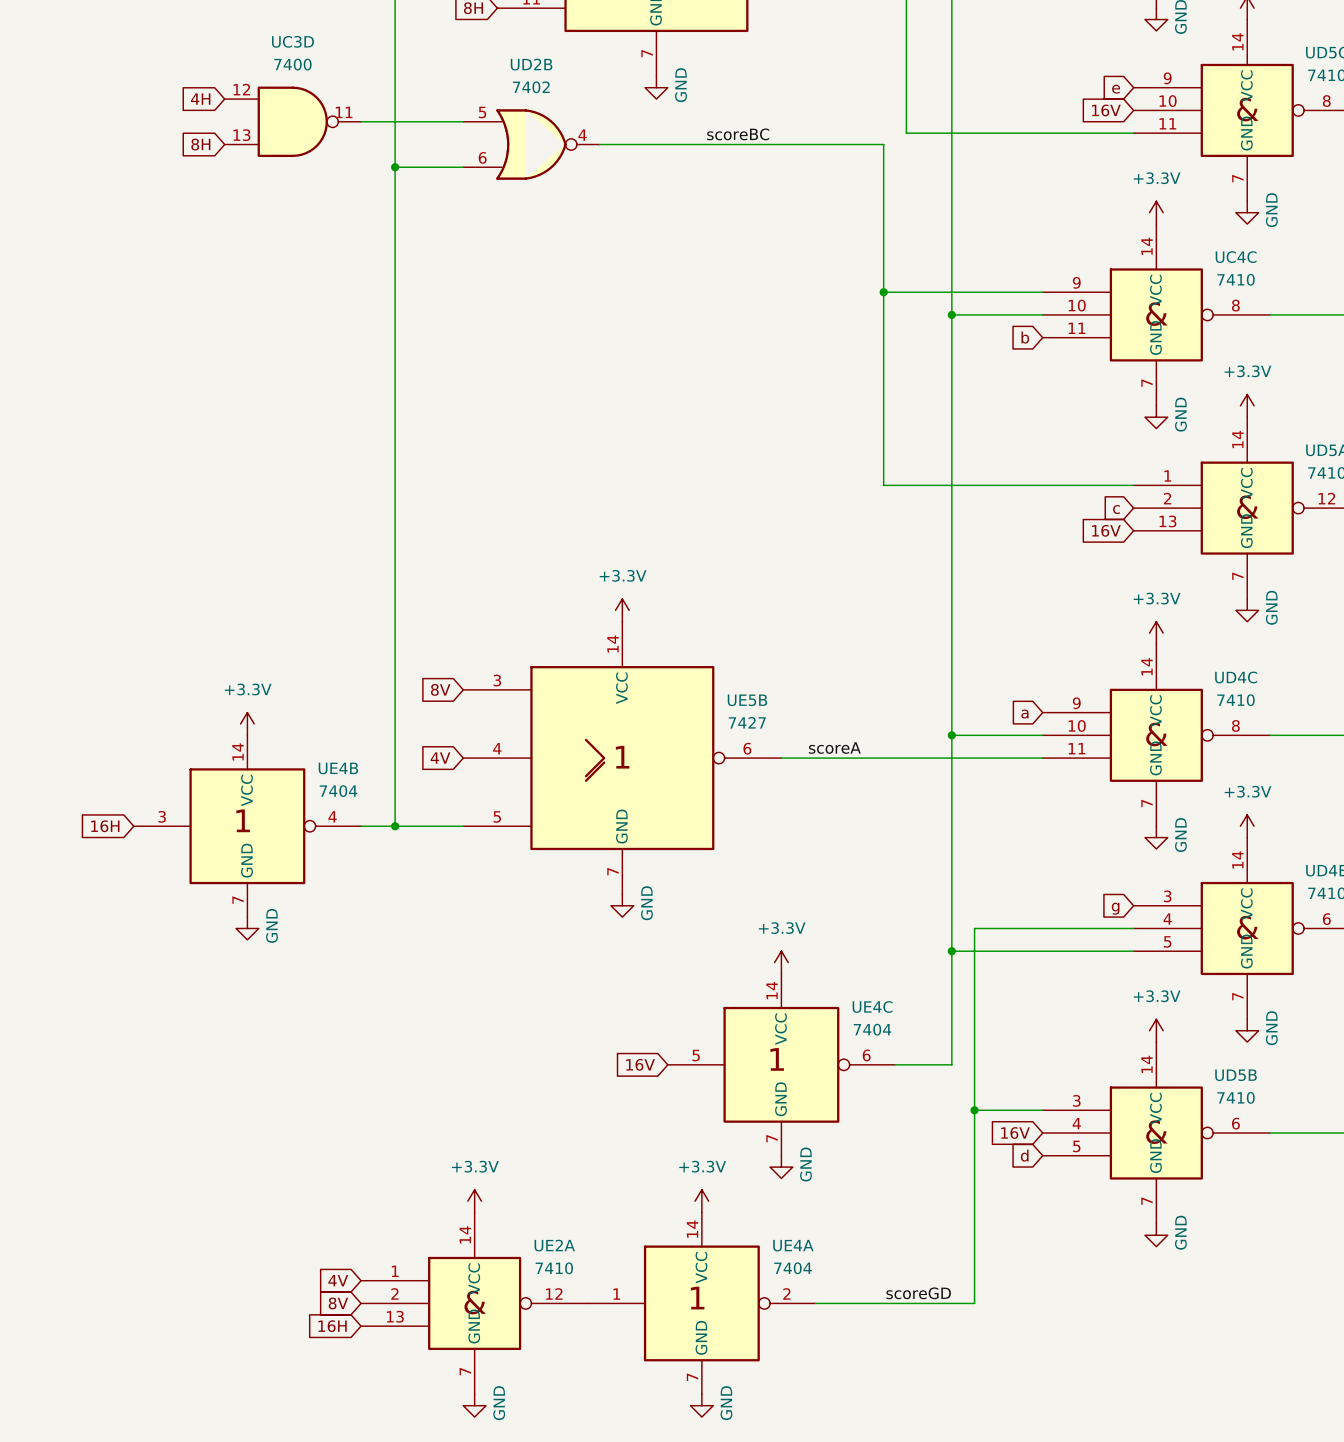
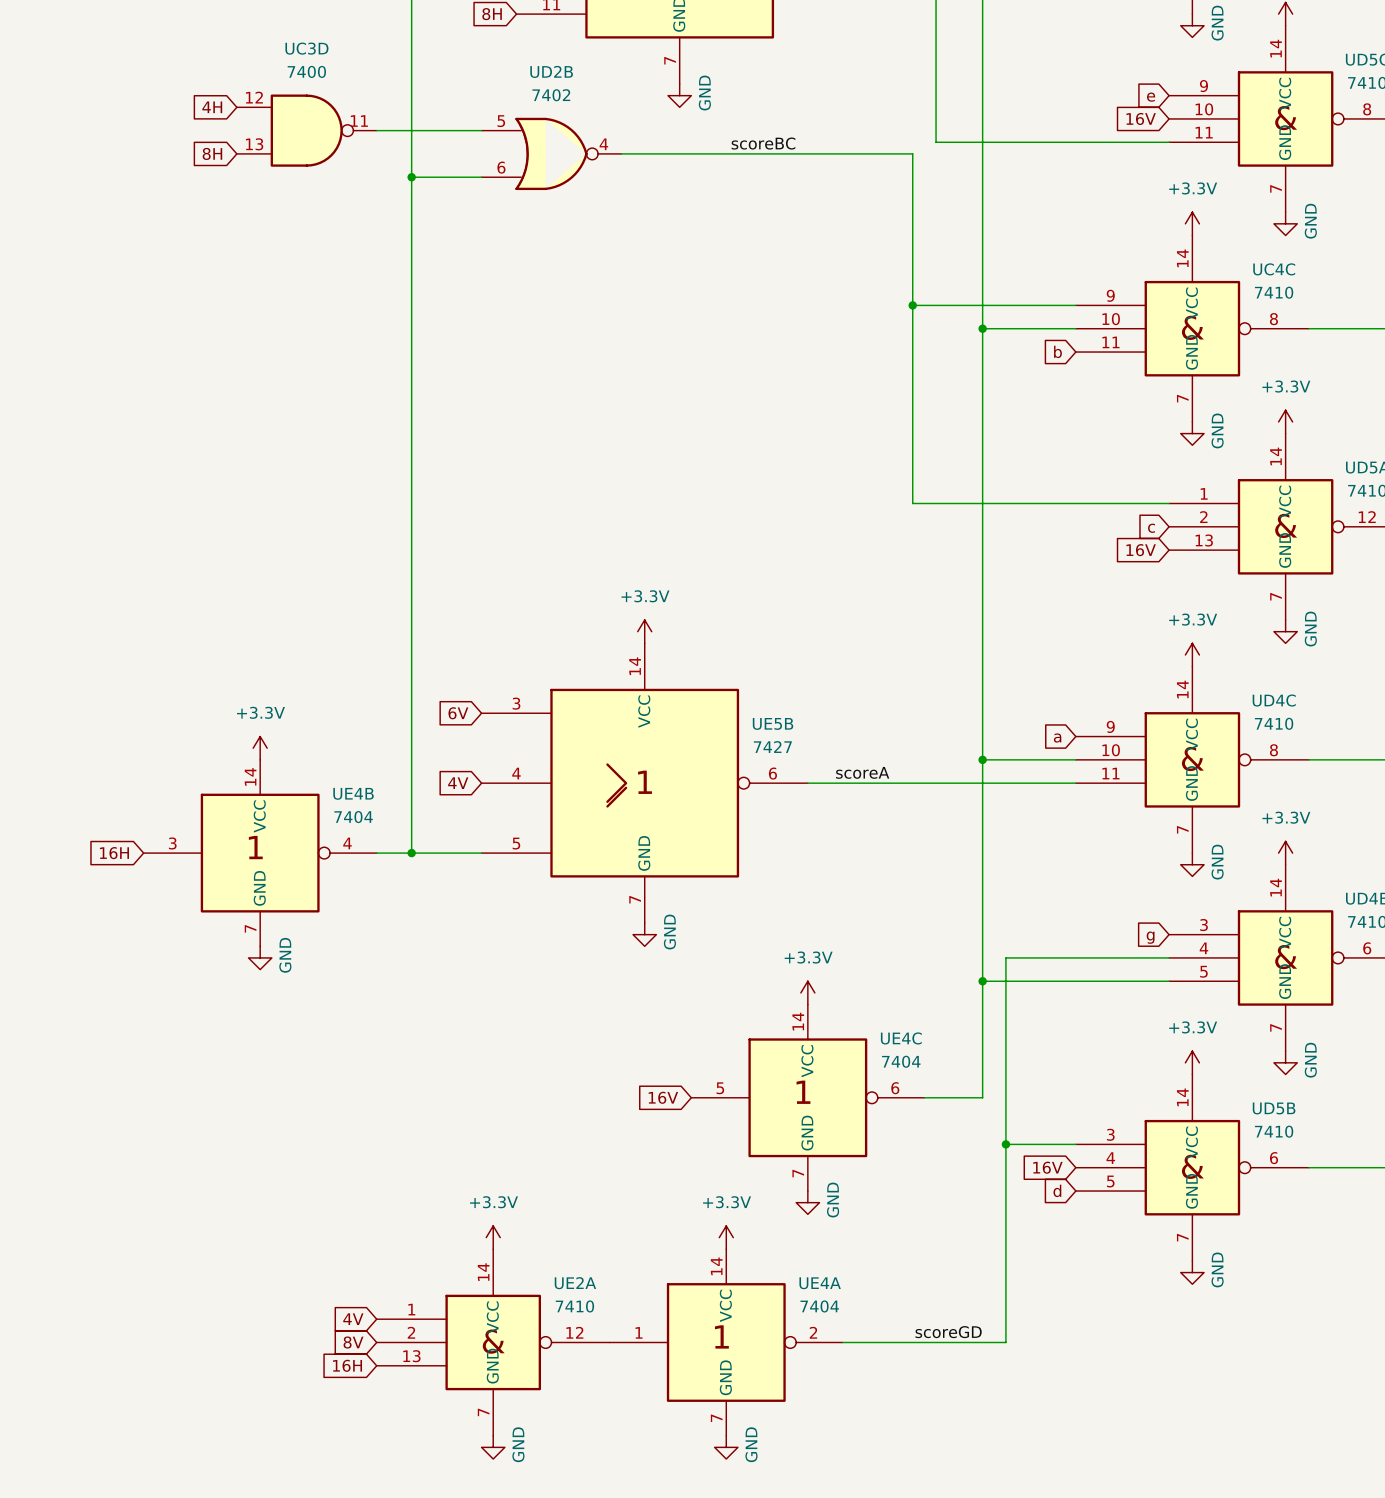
global label: 8V (440, 689) -> 6V (458, 713)

